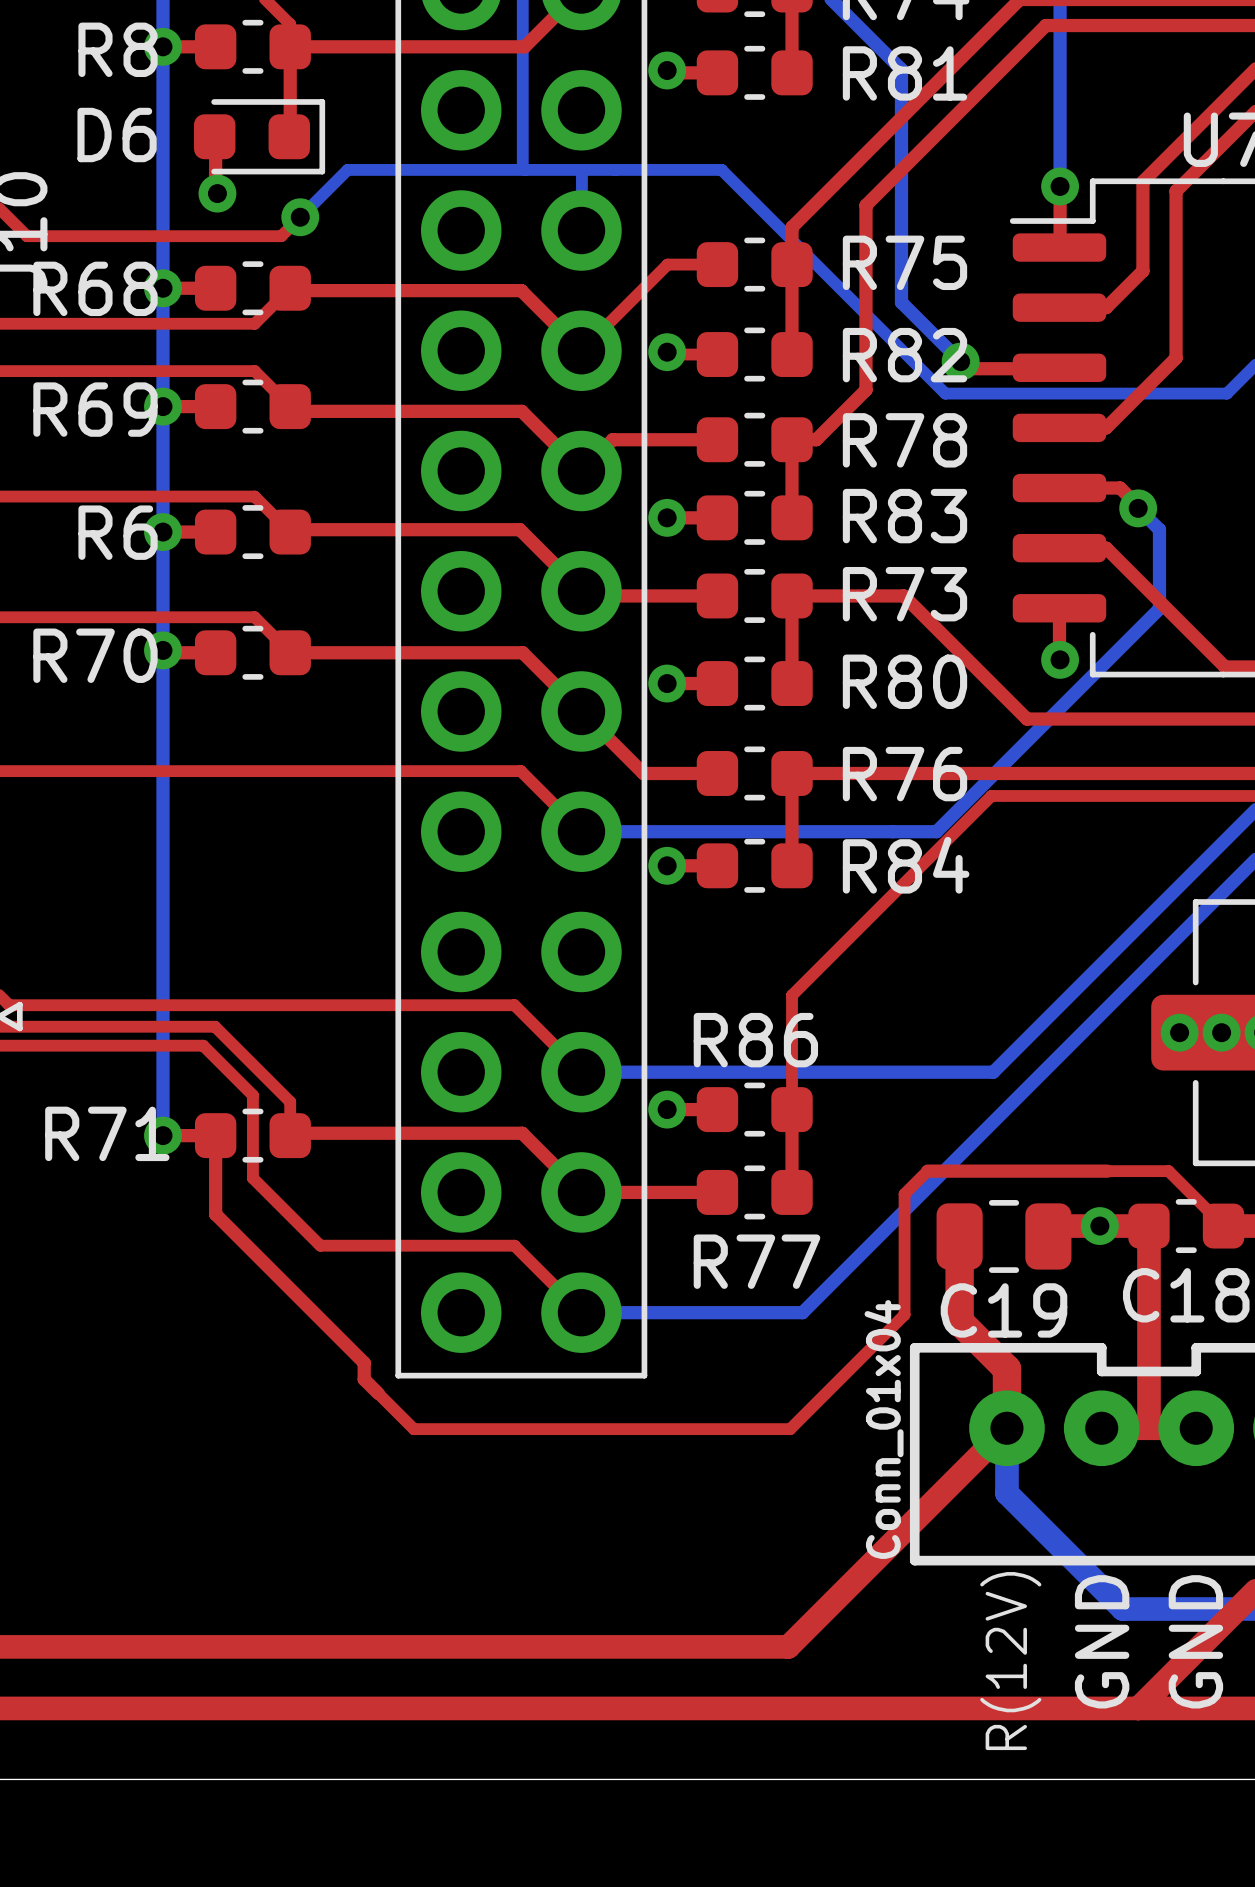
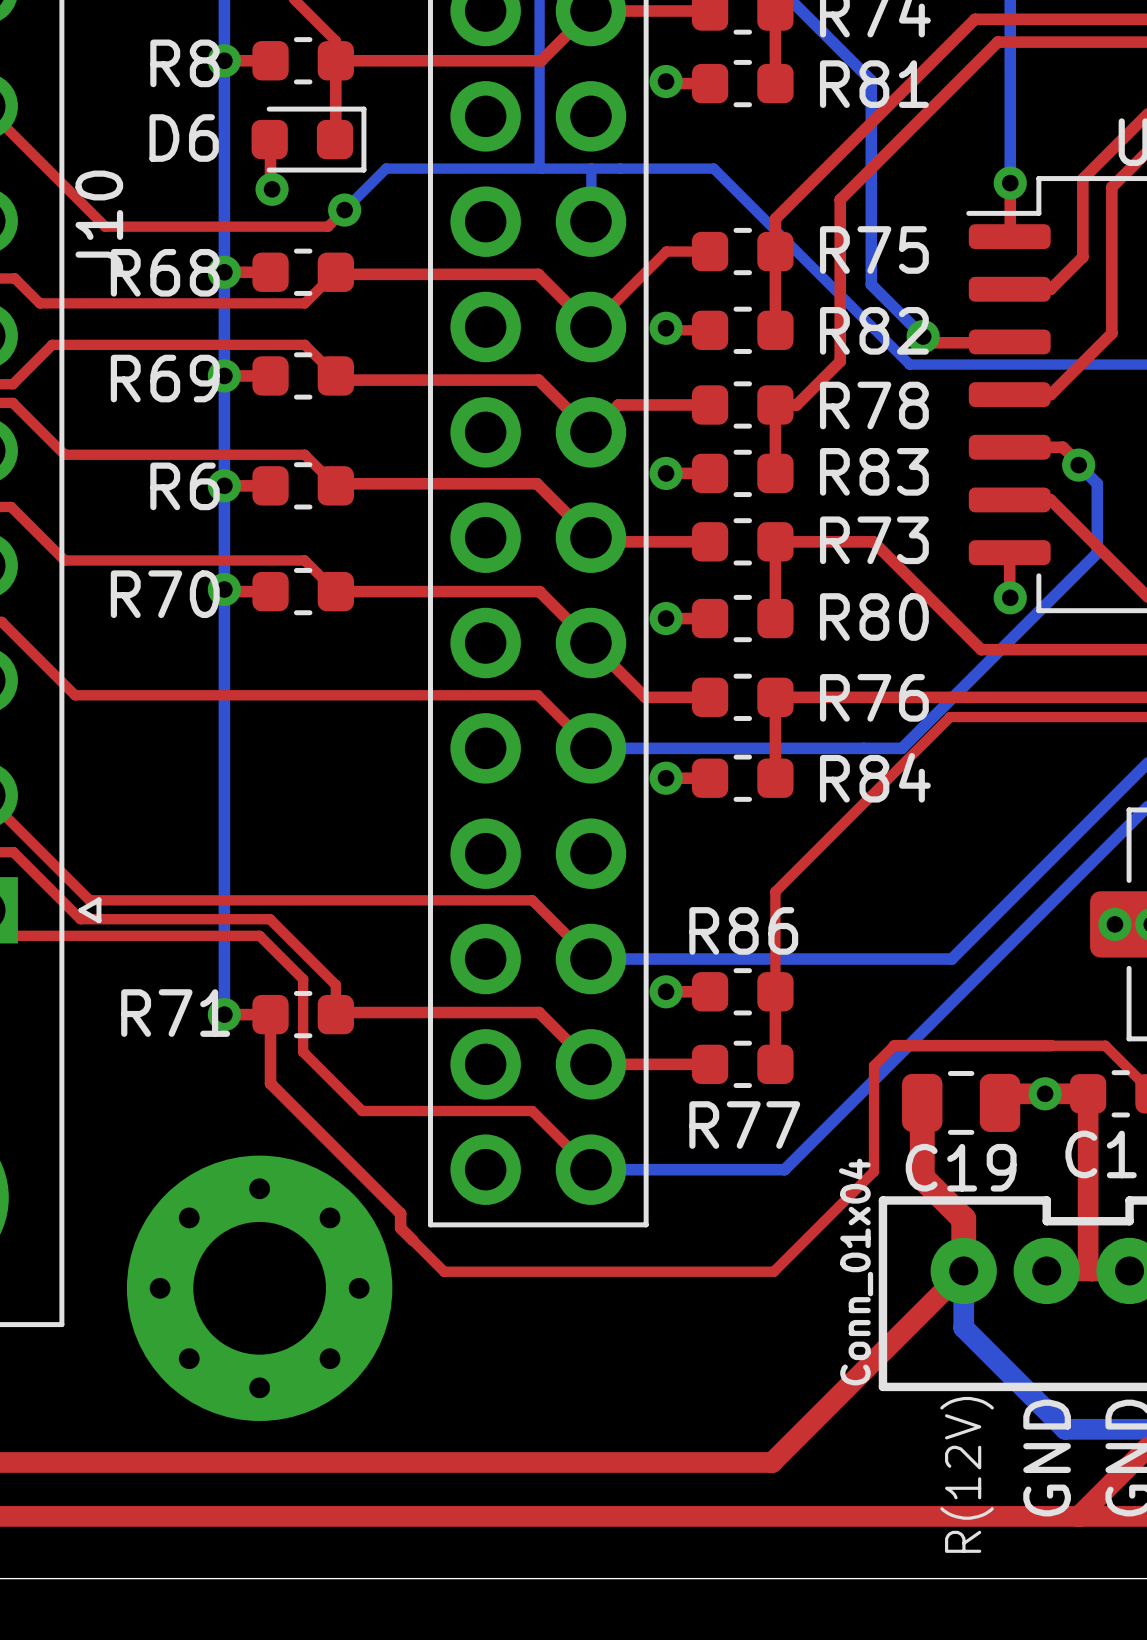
part: none -> (259, 1288)

